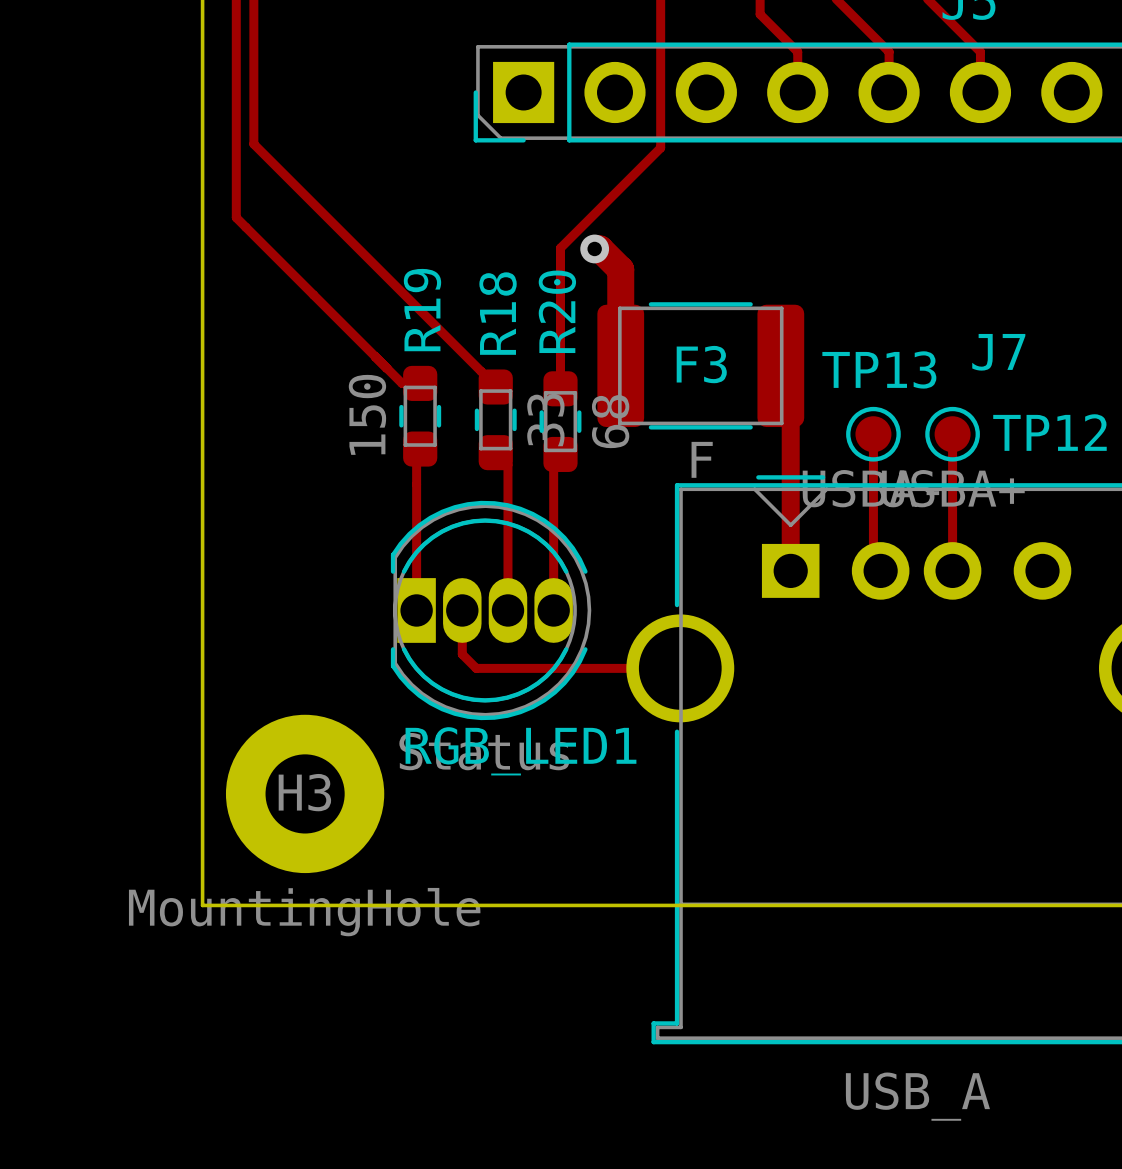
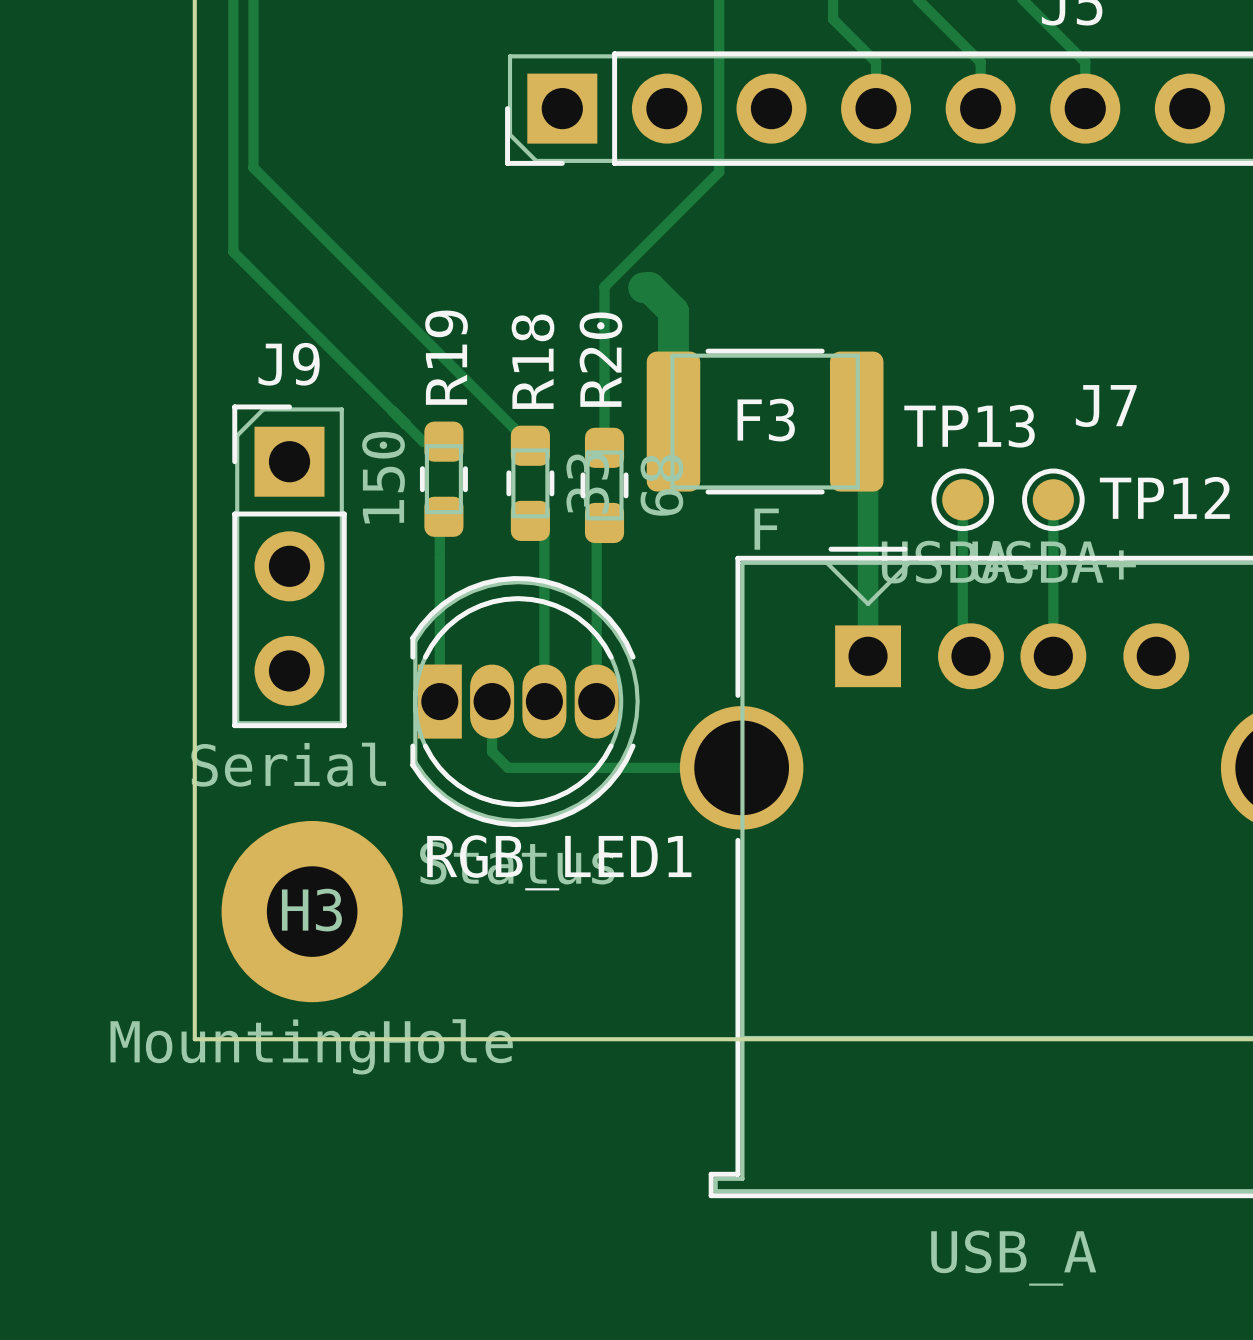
via: (594, 248) -> none
J9: none -> Serial (289, 566)

